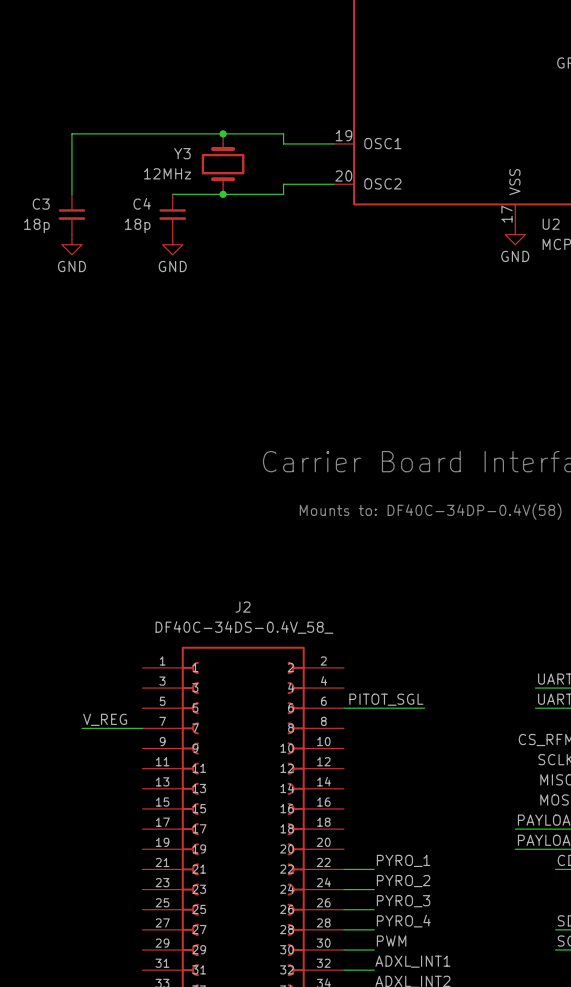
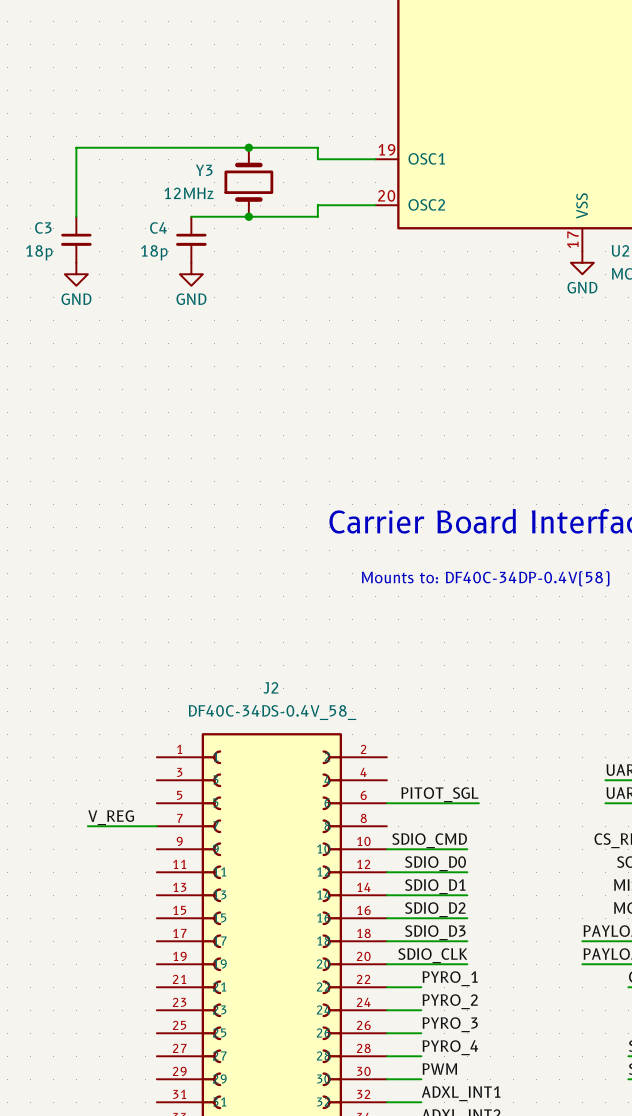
label: none -> SDIO_CMD (429, 840)
wire: none -> (386, 849) (467, 849)
label: none -> SDIO_D0 (435, 863)
wire: none -> (386, 872) (467, 872)
label: none -> SDIO_D1 (435, 886)
wire: none -> (386, 895) (467, 895)
label: none -> SDIO_D2 (435, 909)
wire: none -> (386, 918) (467, 918)
label: none -> SDIO_D3 (435, 932)
wire: none -> (386, 941) (467, 941)
label: none -> SDIO_CLK (432, 955)
wire: none -> (386, 964) (467, 964)

